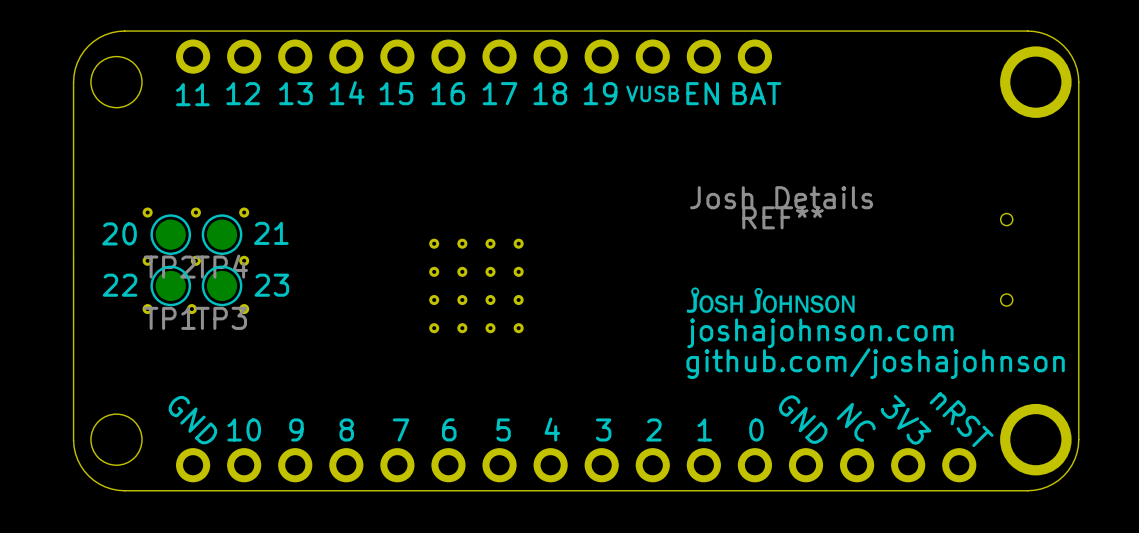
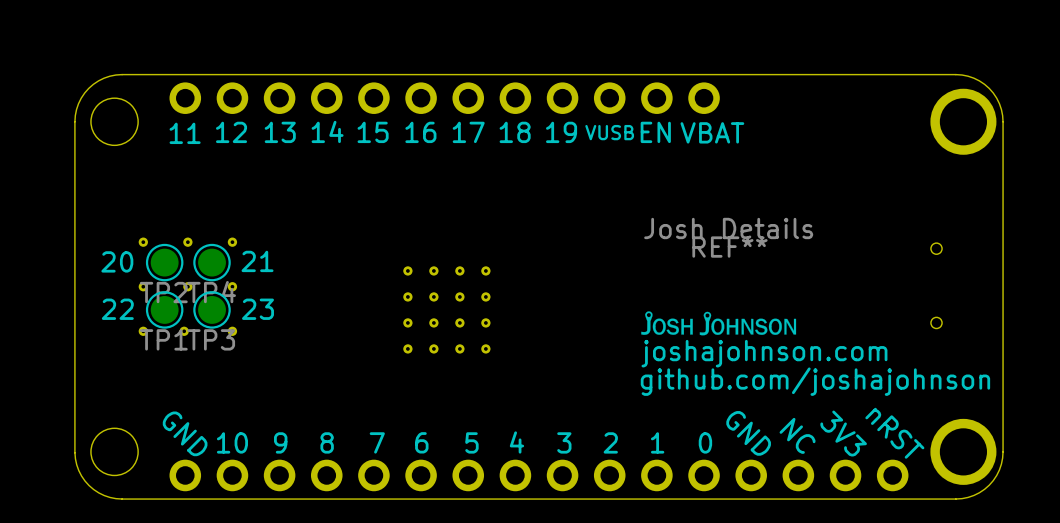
text: BAT (756, 93) -> VBAT (712, 132)

